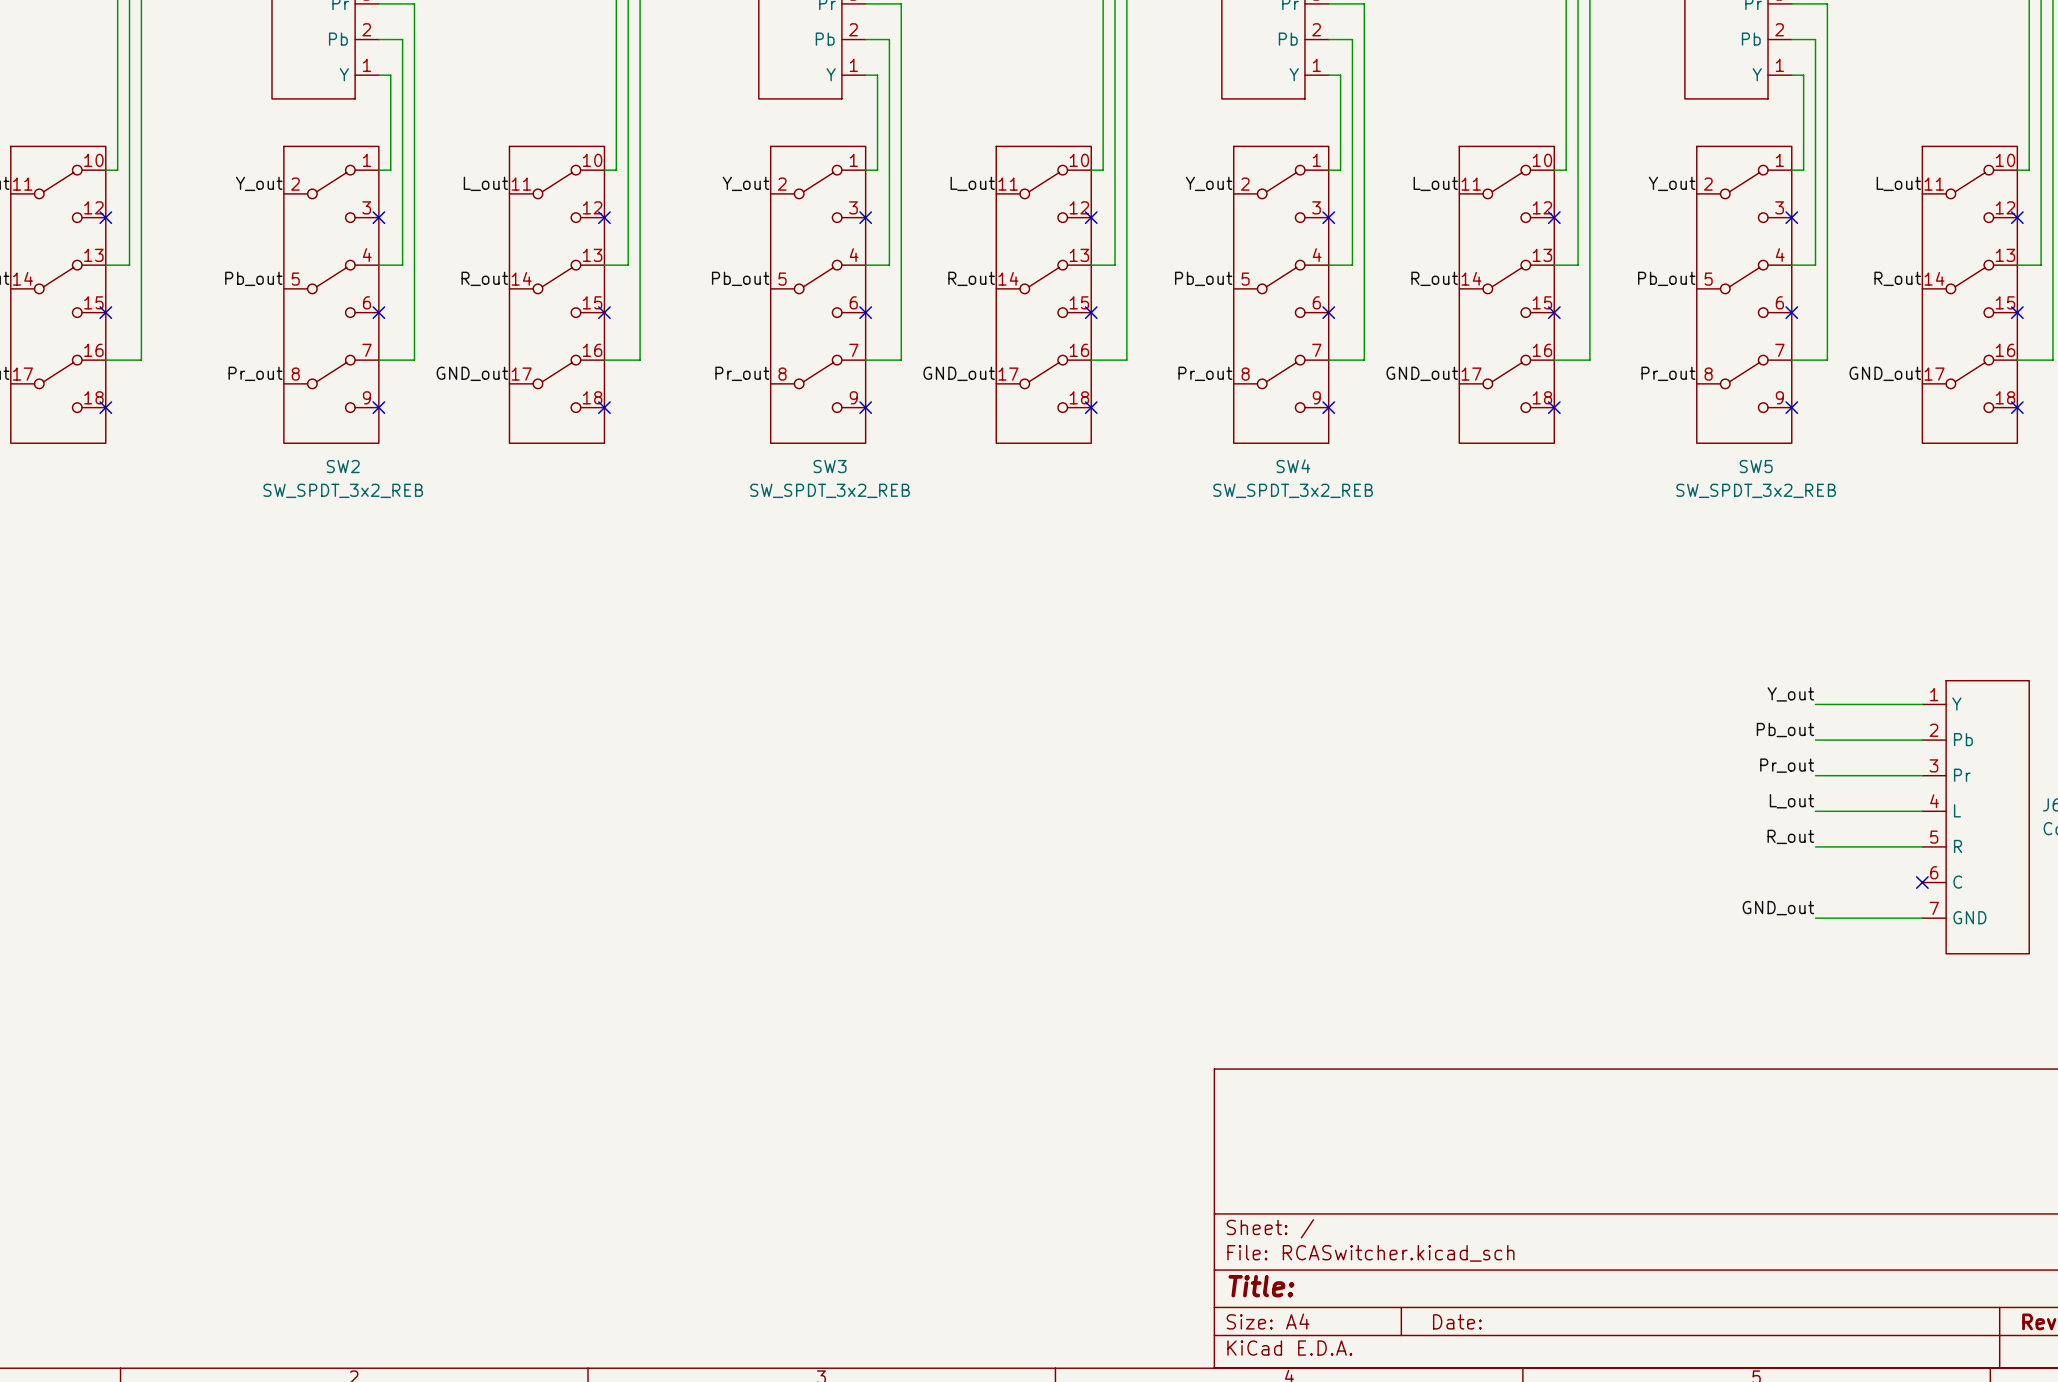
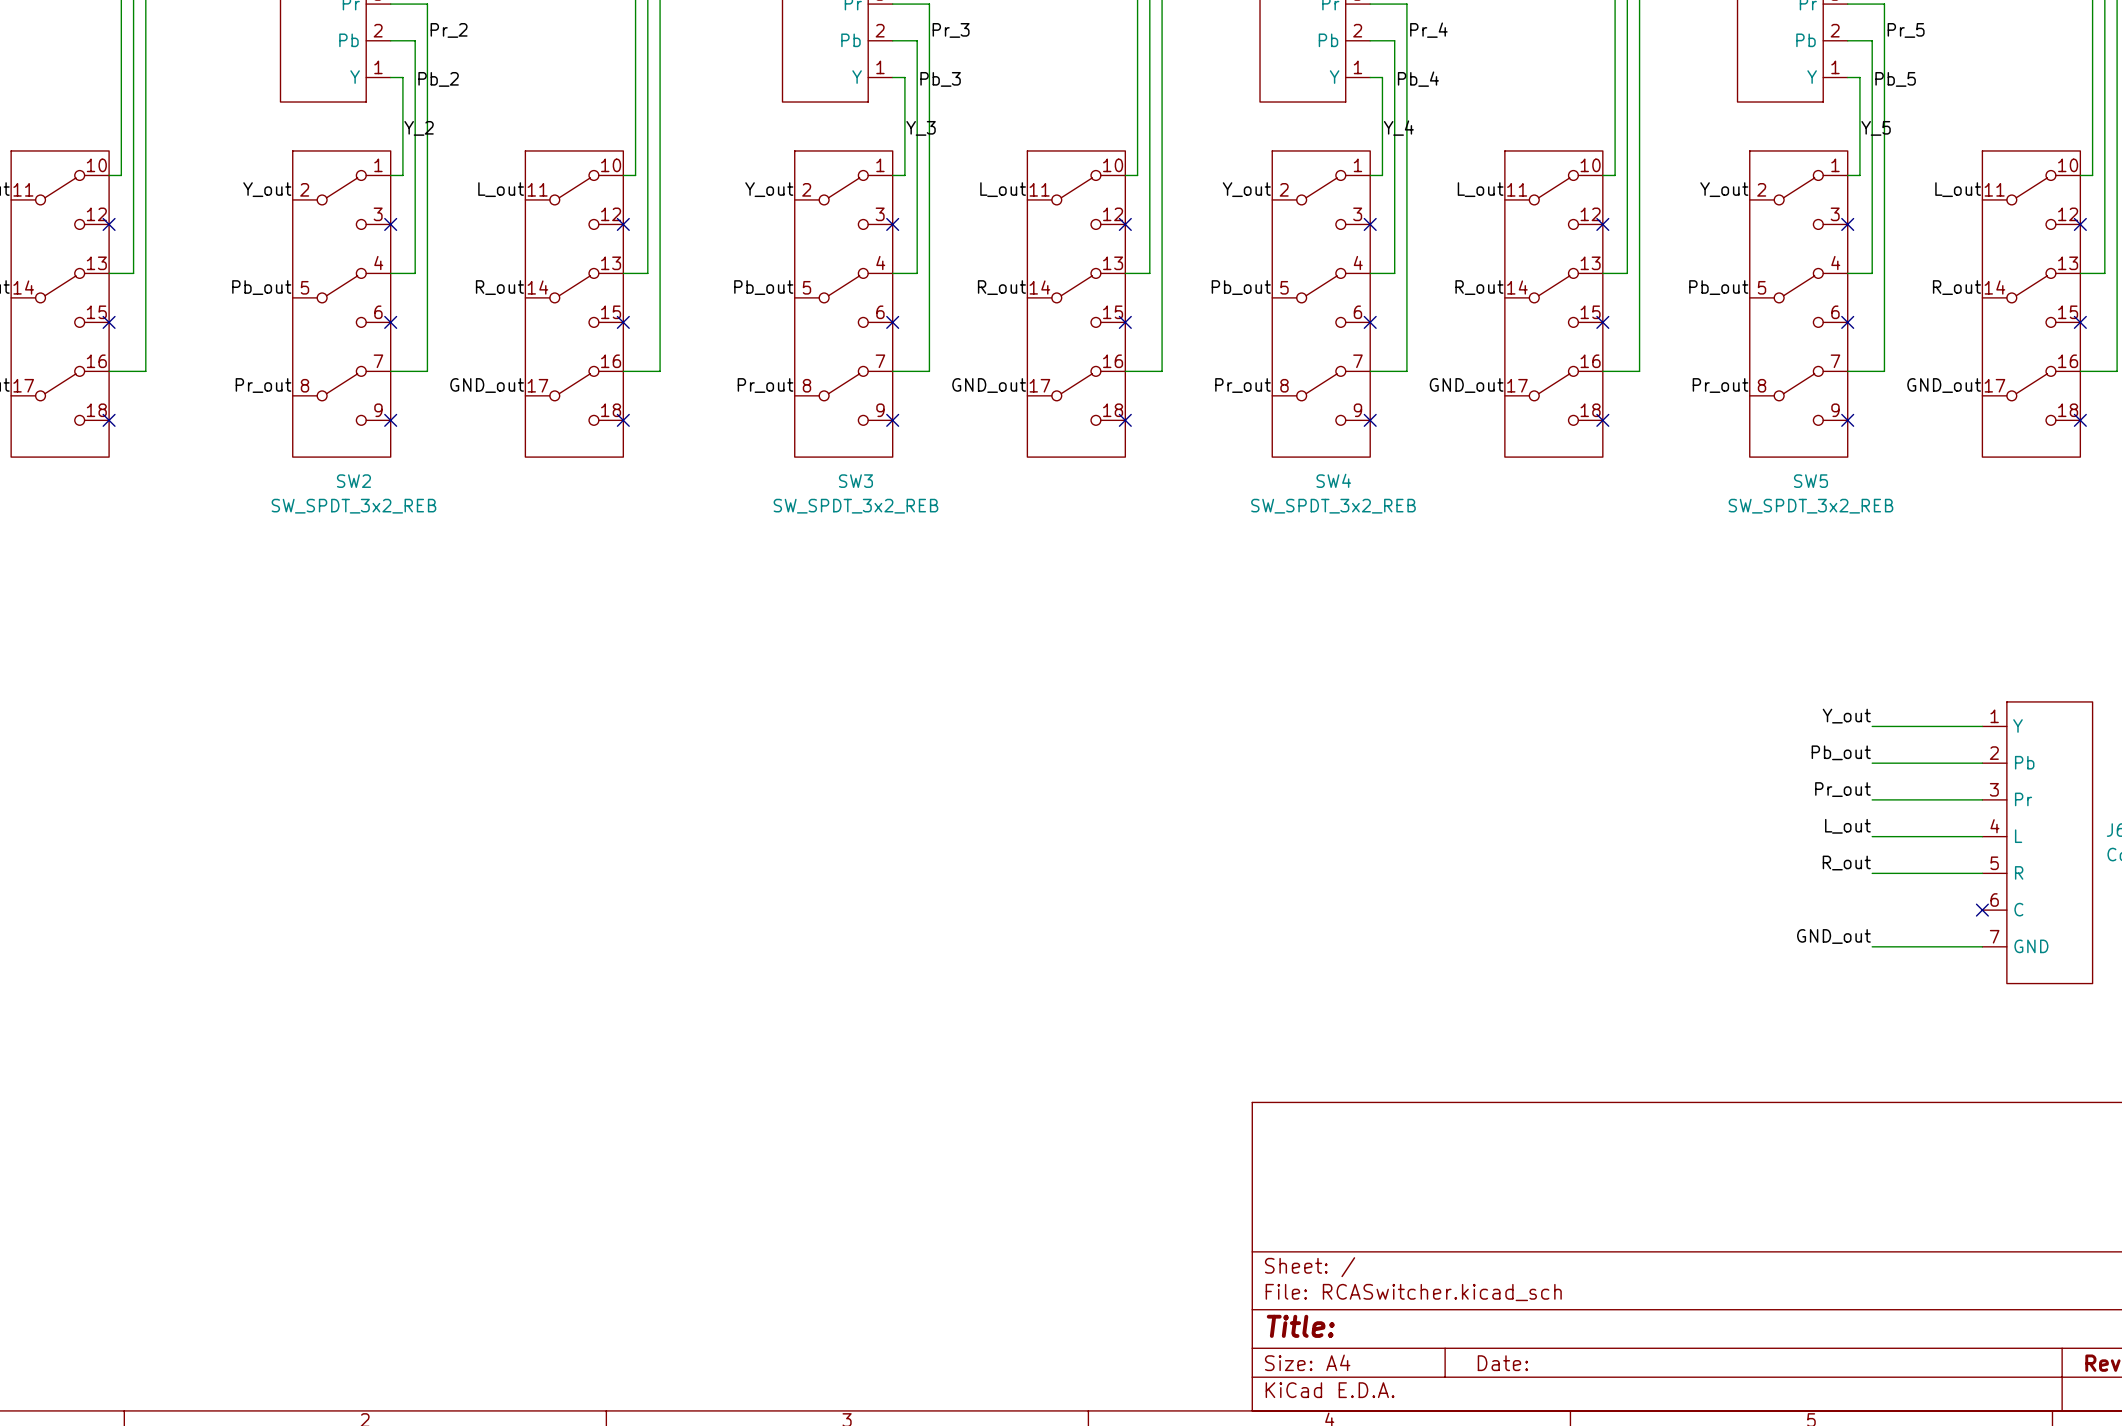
label: none -> Pr_2 (449, 30)
label: none -> Pr_3 (951, 30)
label: none -> Pr_4 (1428, 30)
label: none -> Pr_5 (1906, 30)
label: none -> Pb_4 (1418, 79)
label: none -> Pb_2 (438, 79)
label: none -> Pb_3 (940, 79)
label: none -> Pb_5 (1895, 79)
label: none -> Y_2 (419, 128)
label: none -> Y_3 (921, 128)
label: none -> Y_4 (1398, 128)
label: none -> Y_5 (1876, 128)

